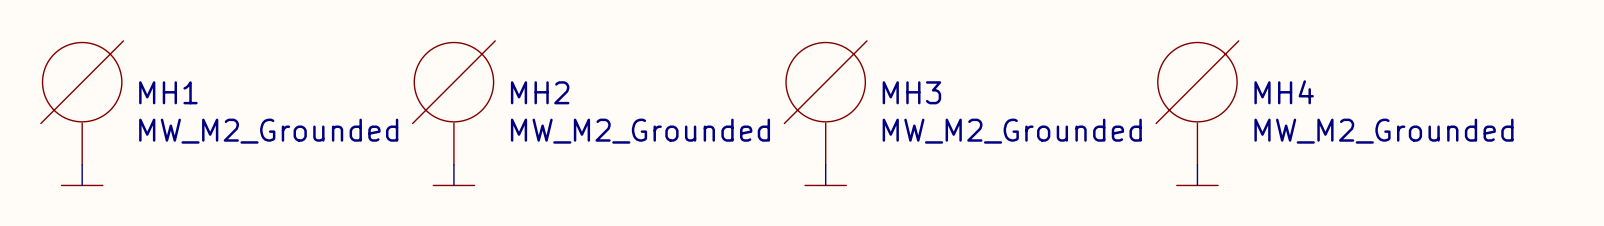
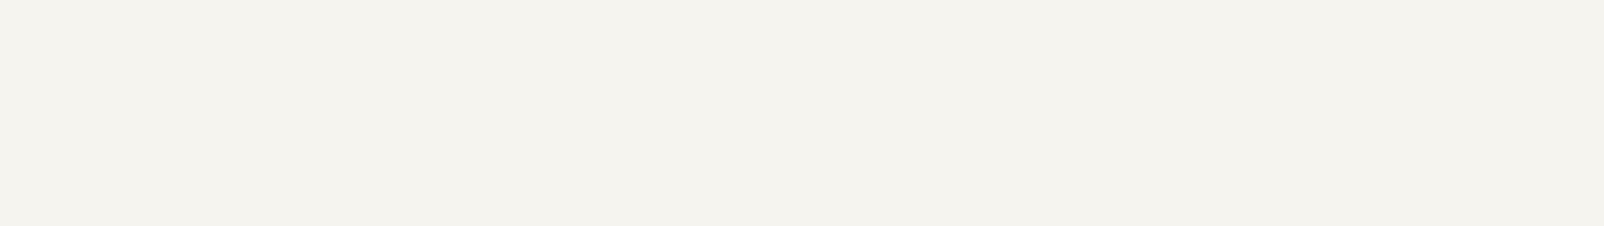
MH1: MW_M2_Grounded (82, 102) -> none
MH2: MW_M2_Grounded (453, 102) -> none
MH3: MW_M2_Grounded (825, 102) -> none
MH4: MW_M2_Grounded (1197, 102) -> none
wire: (82, 164) (82, 185) -> none
wire: (453, 164) (453, 185) -> none
wire: (825, 164) (825, 185) -> none
wire: (1197, 164) (1197, 185) -> none
power symbol: (82, 185) -> none
power symbol: (453, 185) -> none
power symbol: (825, 185) -> none
power symbol: (1197, 185) -> none

